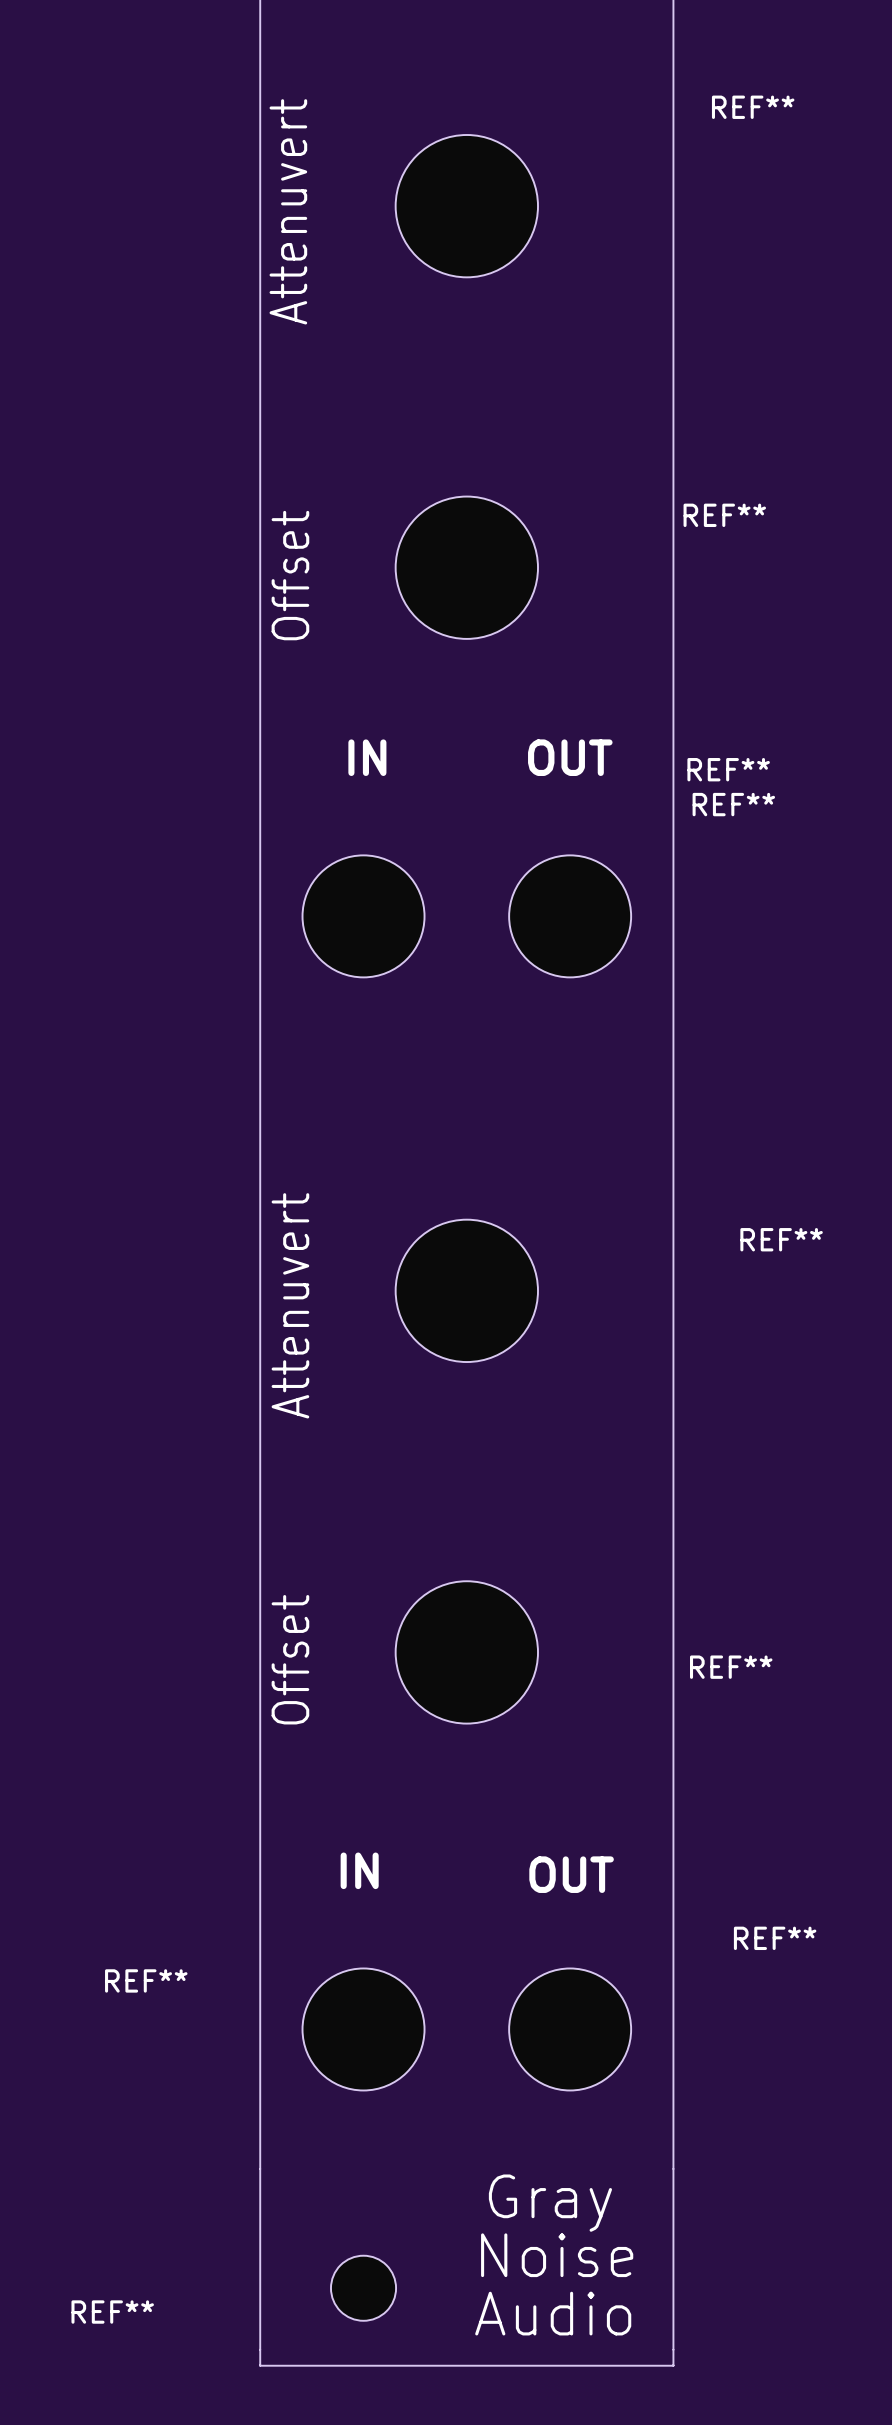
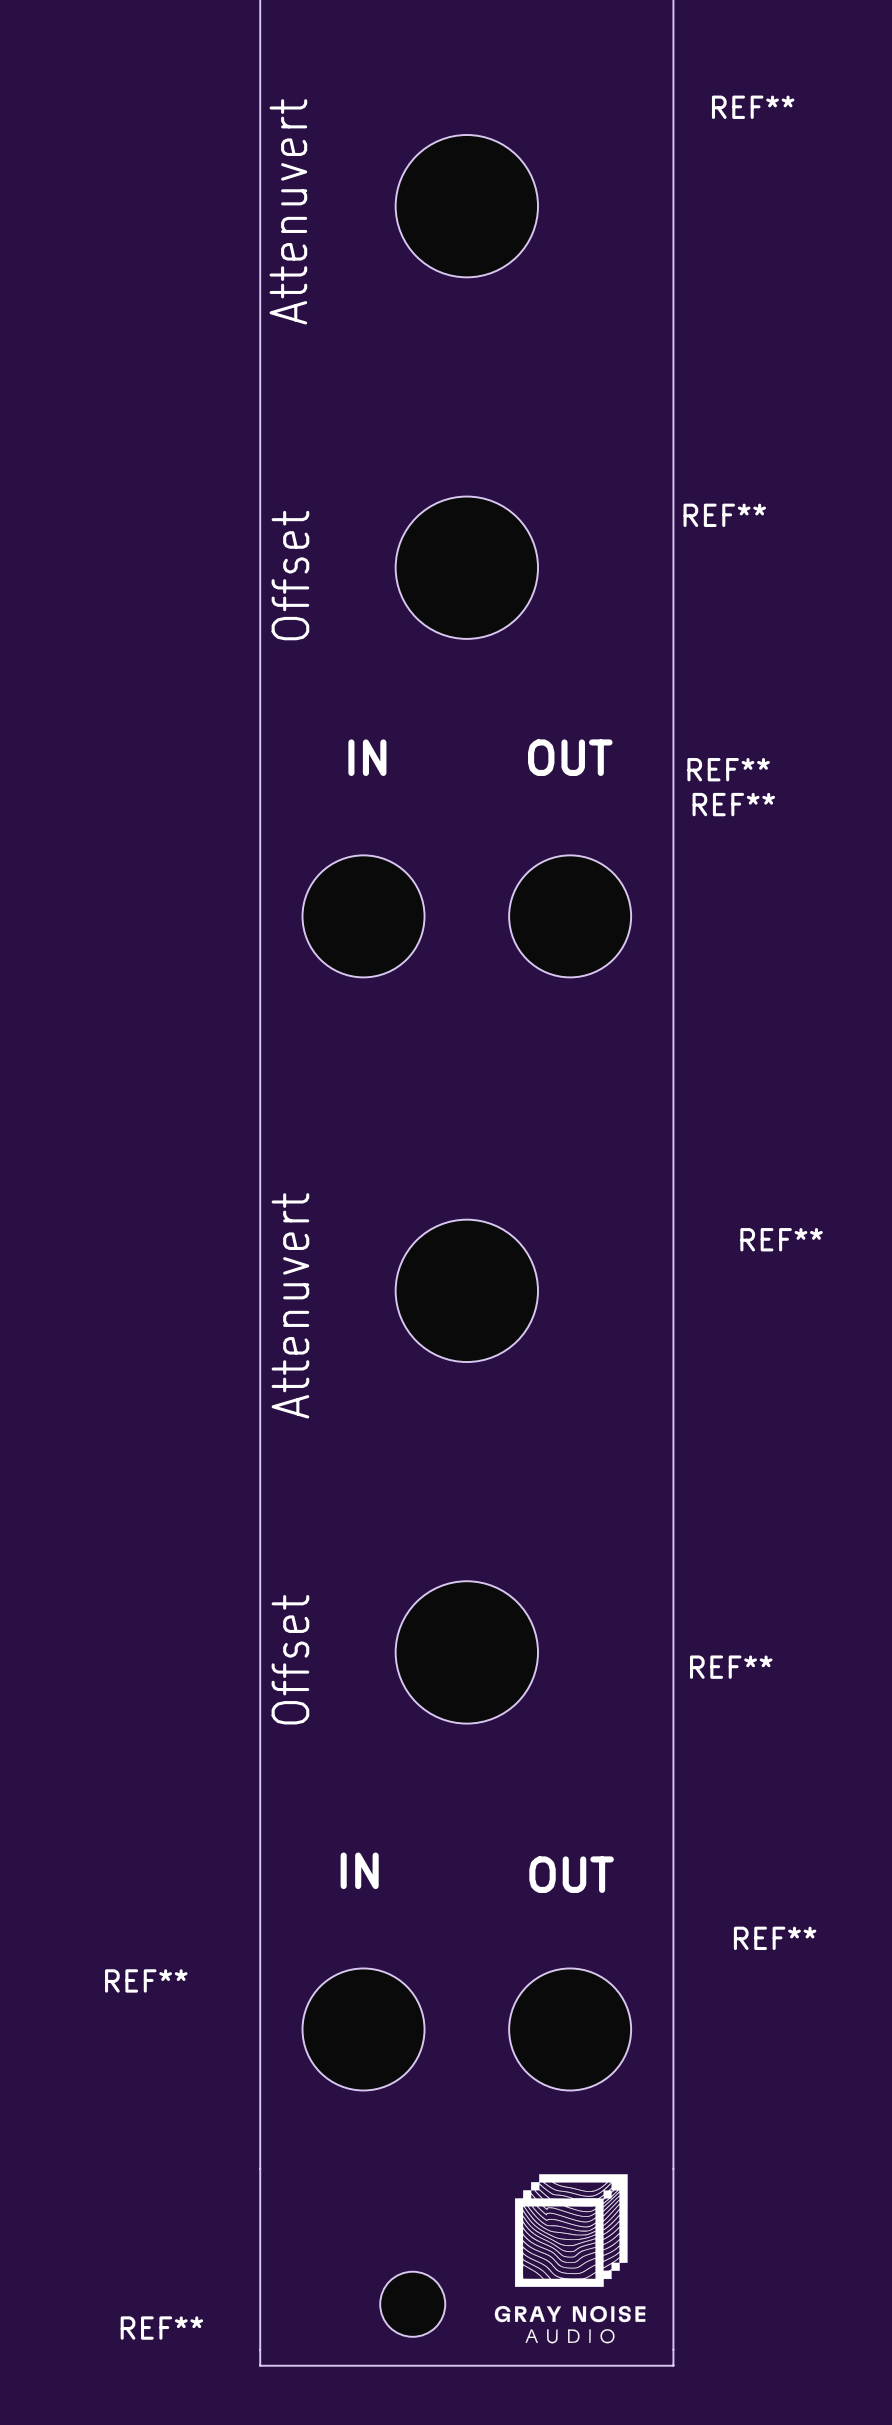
drawing: none -> [494, 2174, 646, 2344]
text: Gray (550, 2203) -> none
text: Noise (557, 2255) -> none
REF** position: (363, 2288) -> (412, 2304)
text: Audio (553, 2313) -> none

